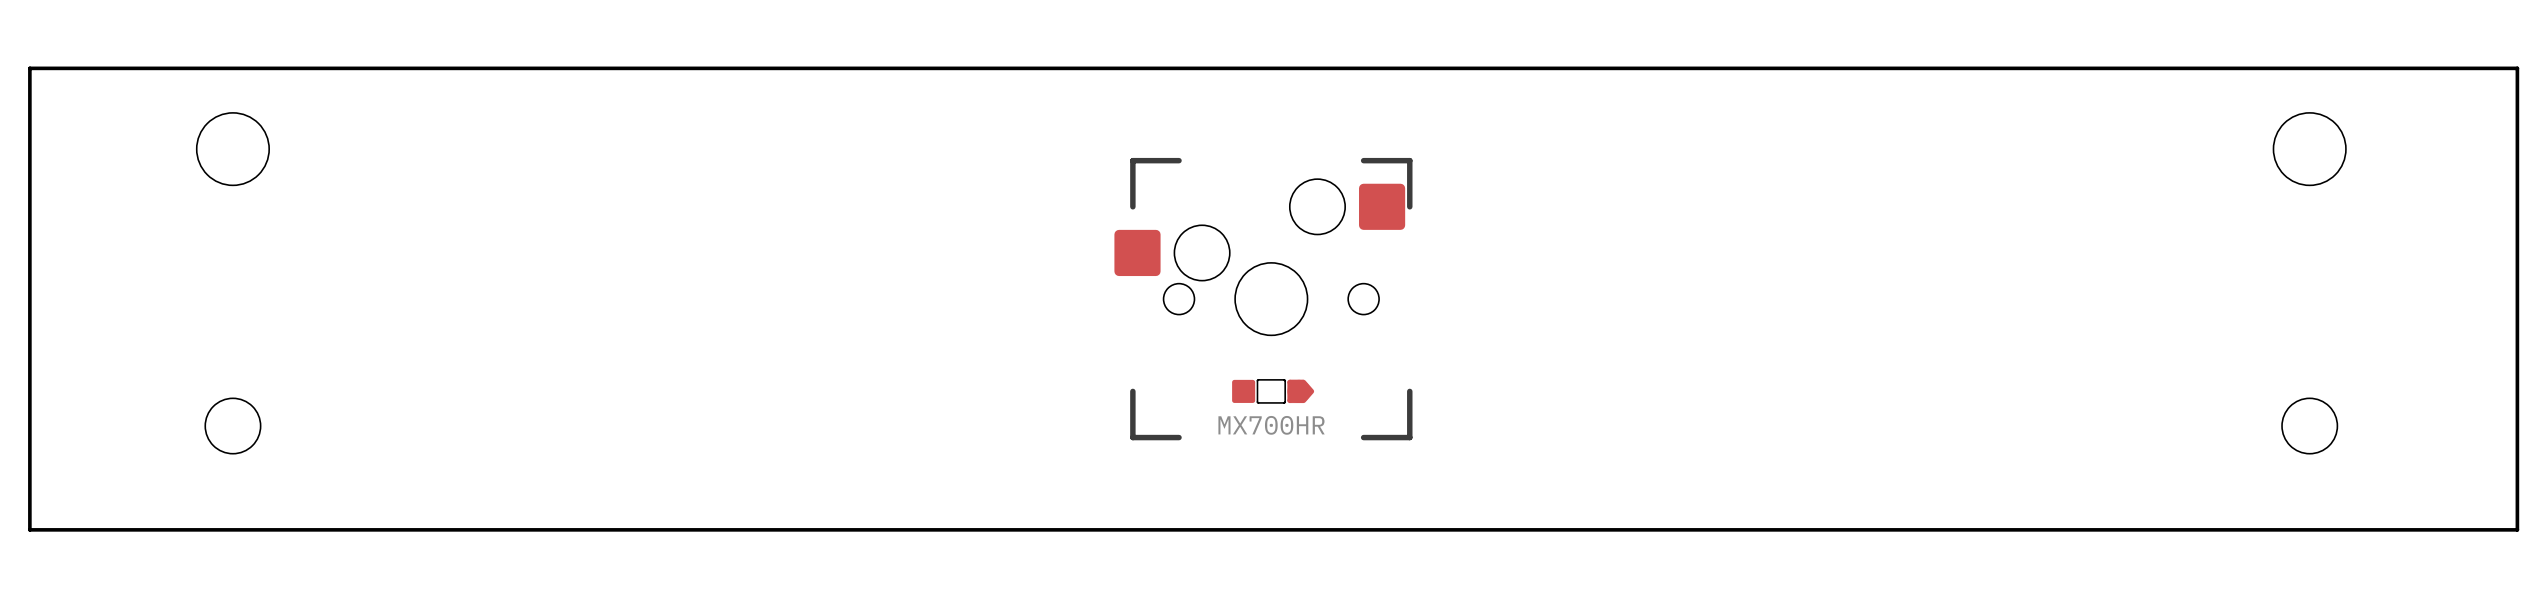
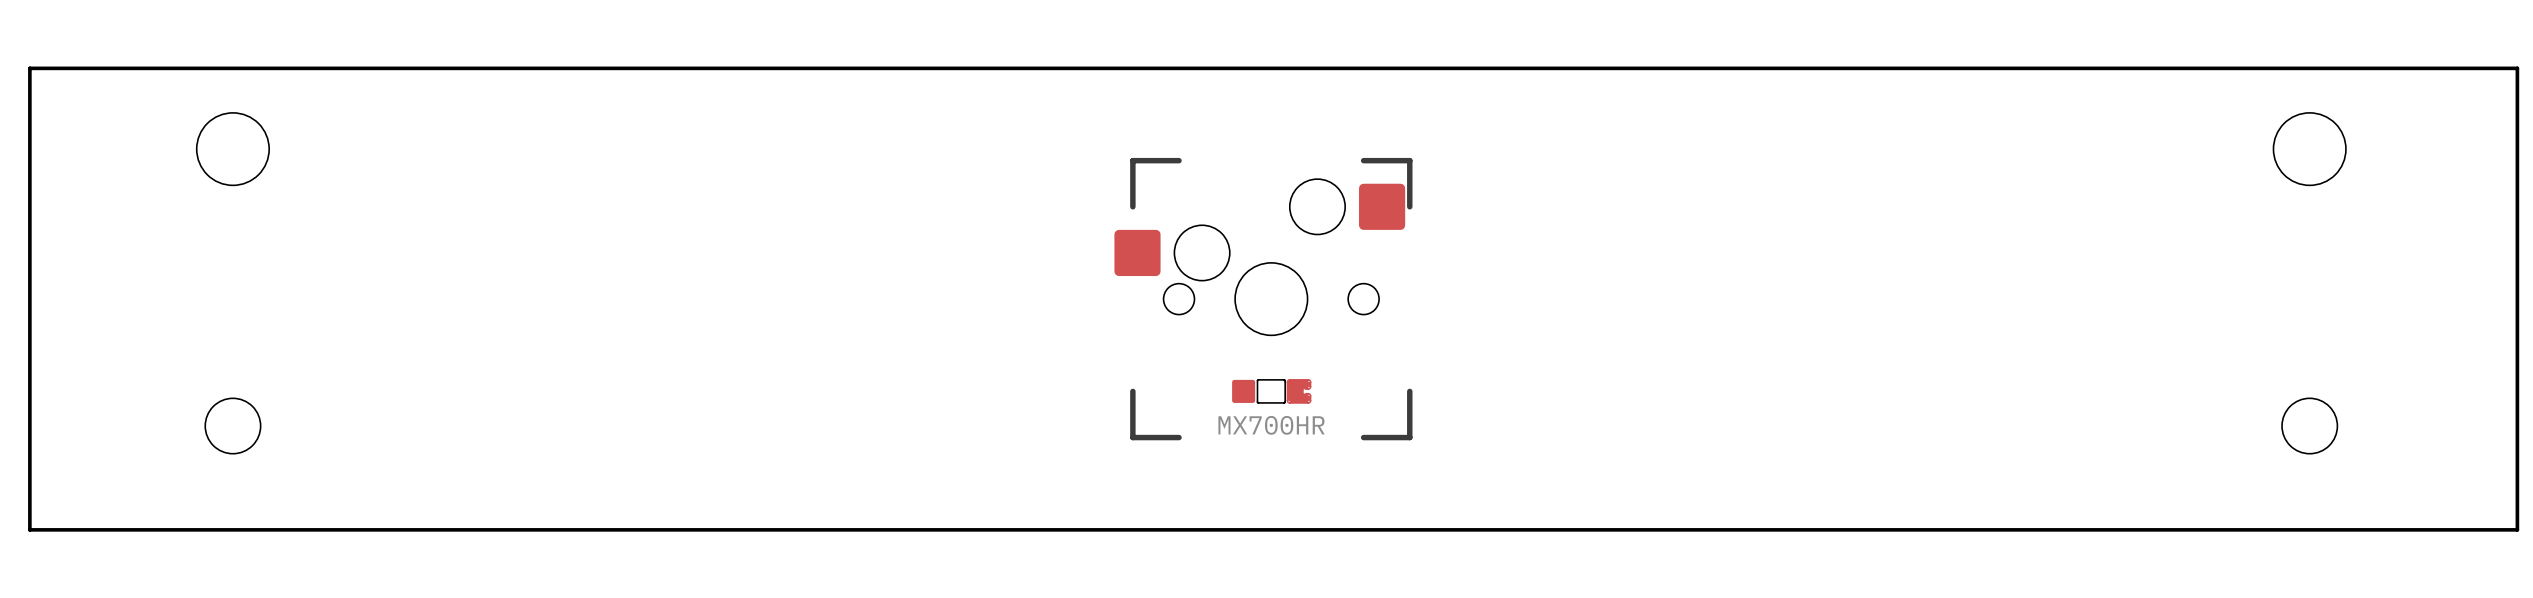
part footprint: [1232, 379, 1315, 404] -> [1232, 379, 1311, 404]

